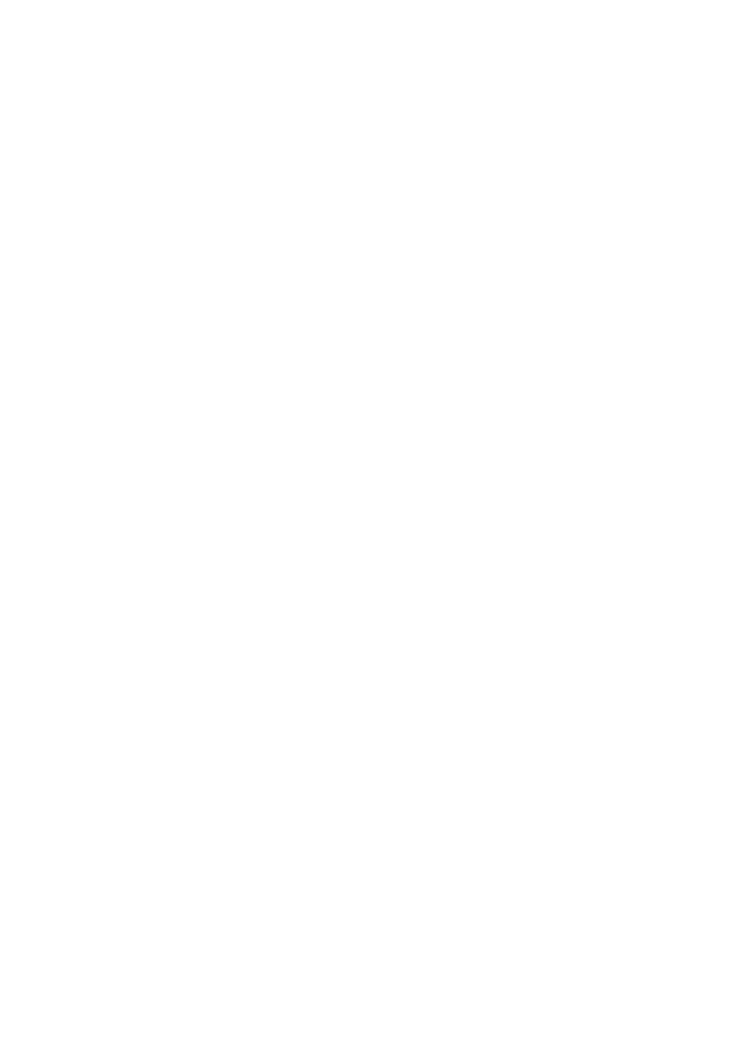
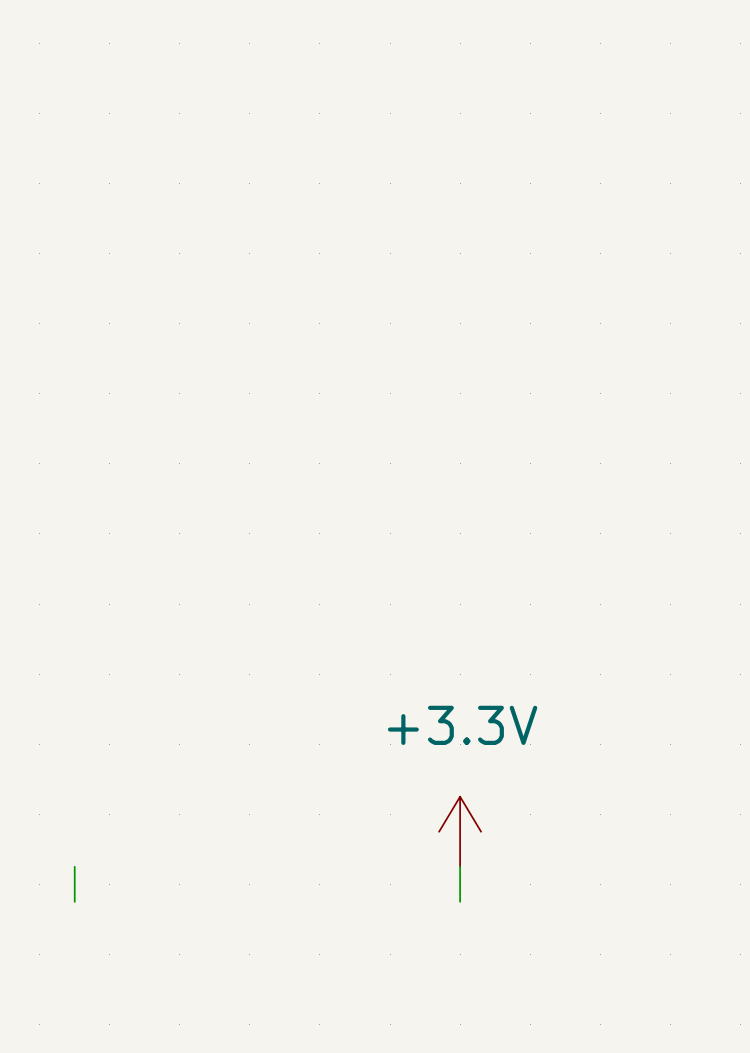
power symbol: none -> +3.3V (460, 831)
wire: none -> (74, 866) (74, 901)
wire: none -> (460, 866) (460, 901)

